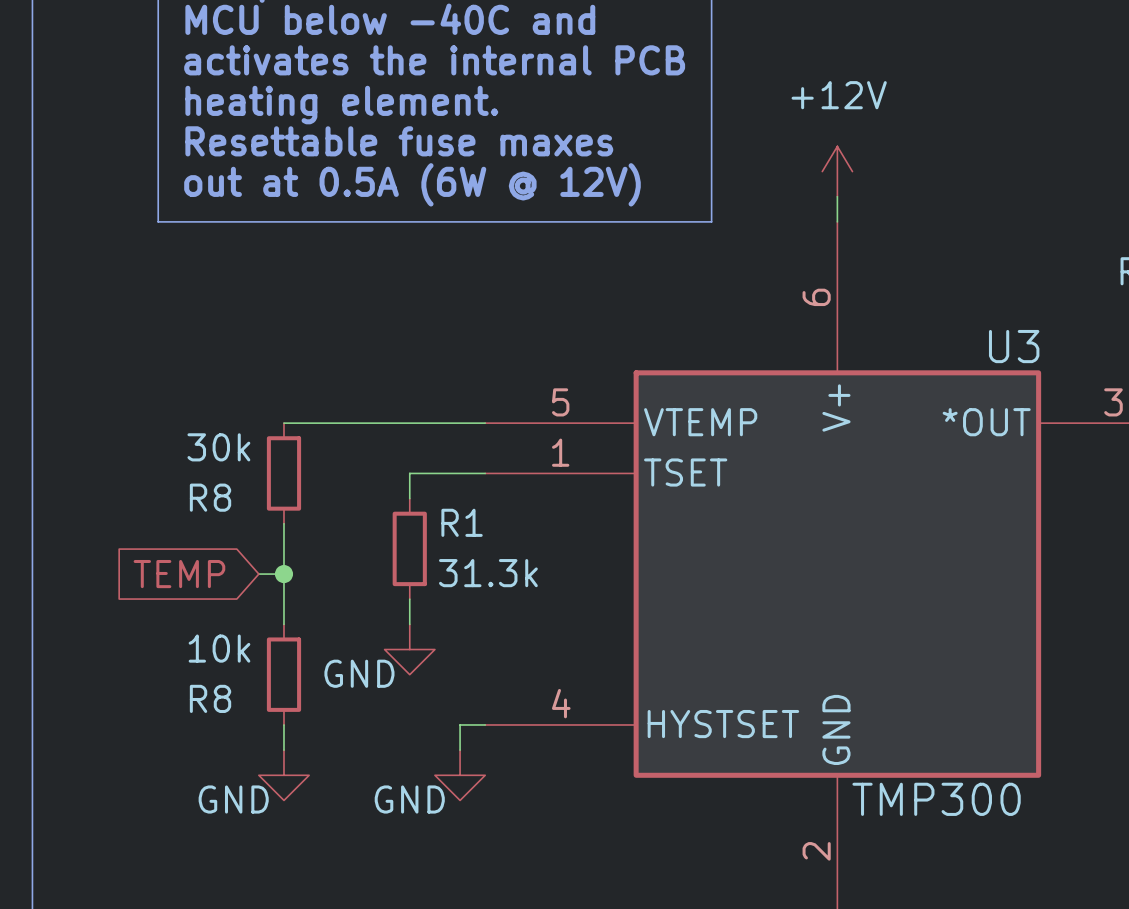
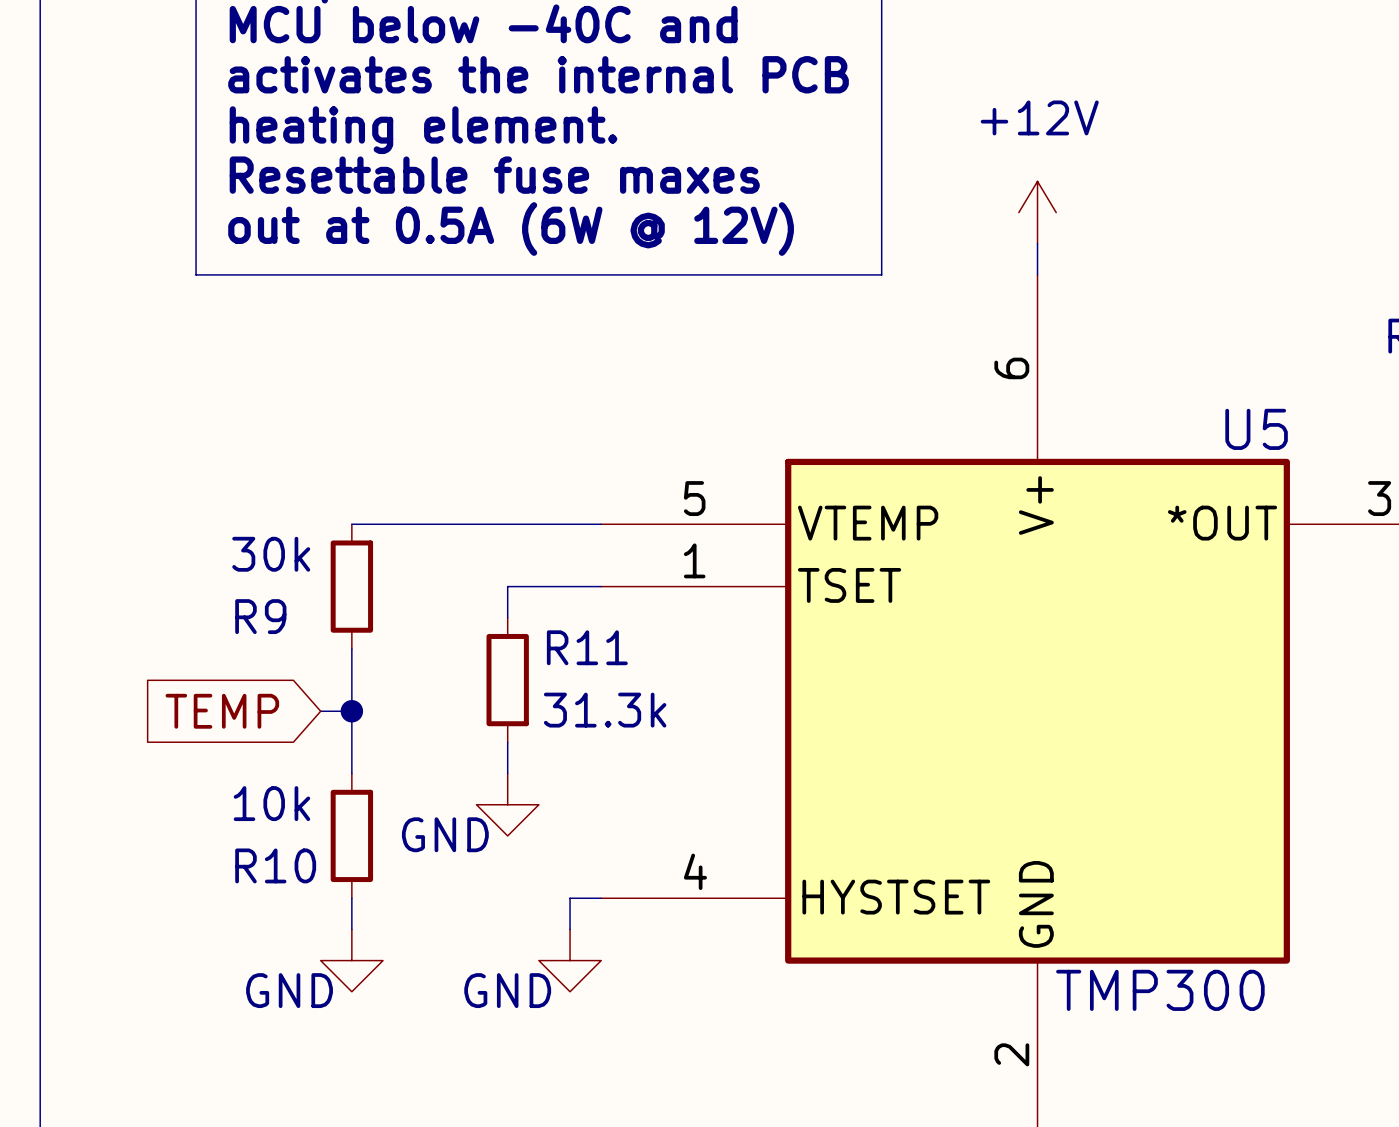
U3 name: U3 (1014, 346) -> U5 (1256, 429)
R8 name: R8 (210, 497) -> R9 (260, 616)
R1 name: R1 (462, 522) -> R11 (587, 647)
R8 name: R8 (210, 698) -> R10 (275, 865)

